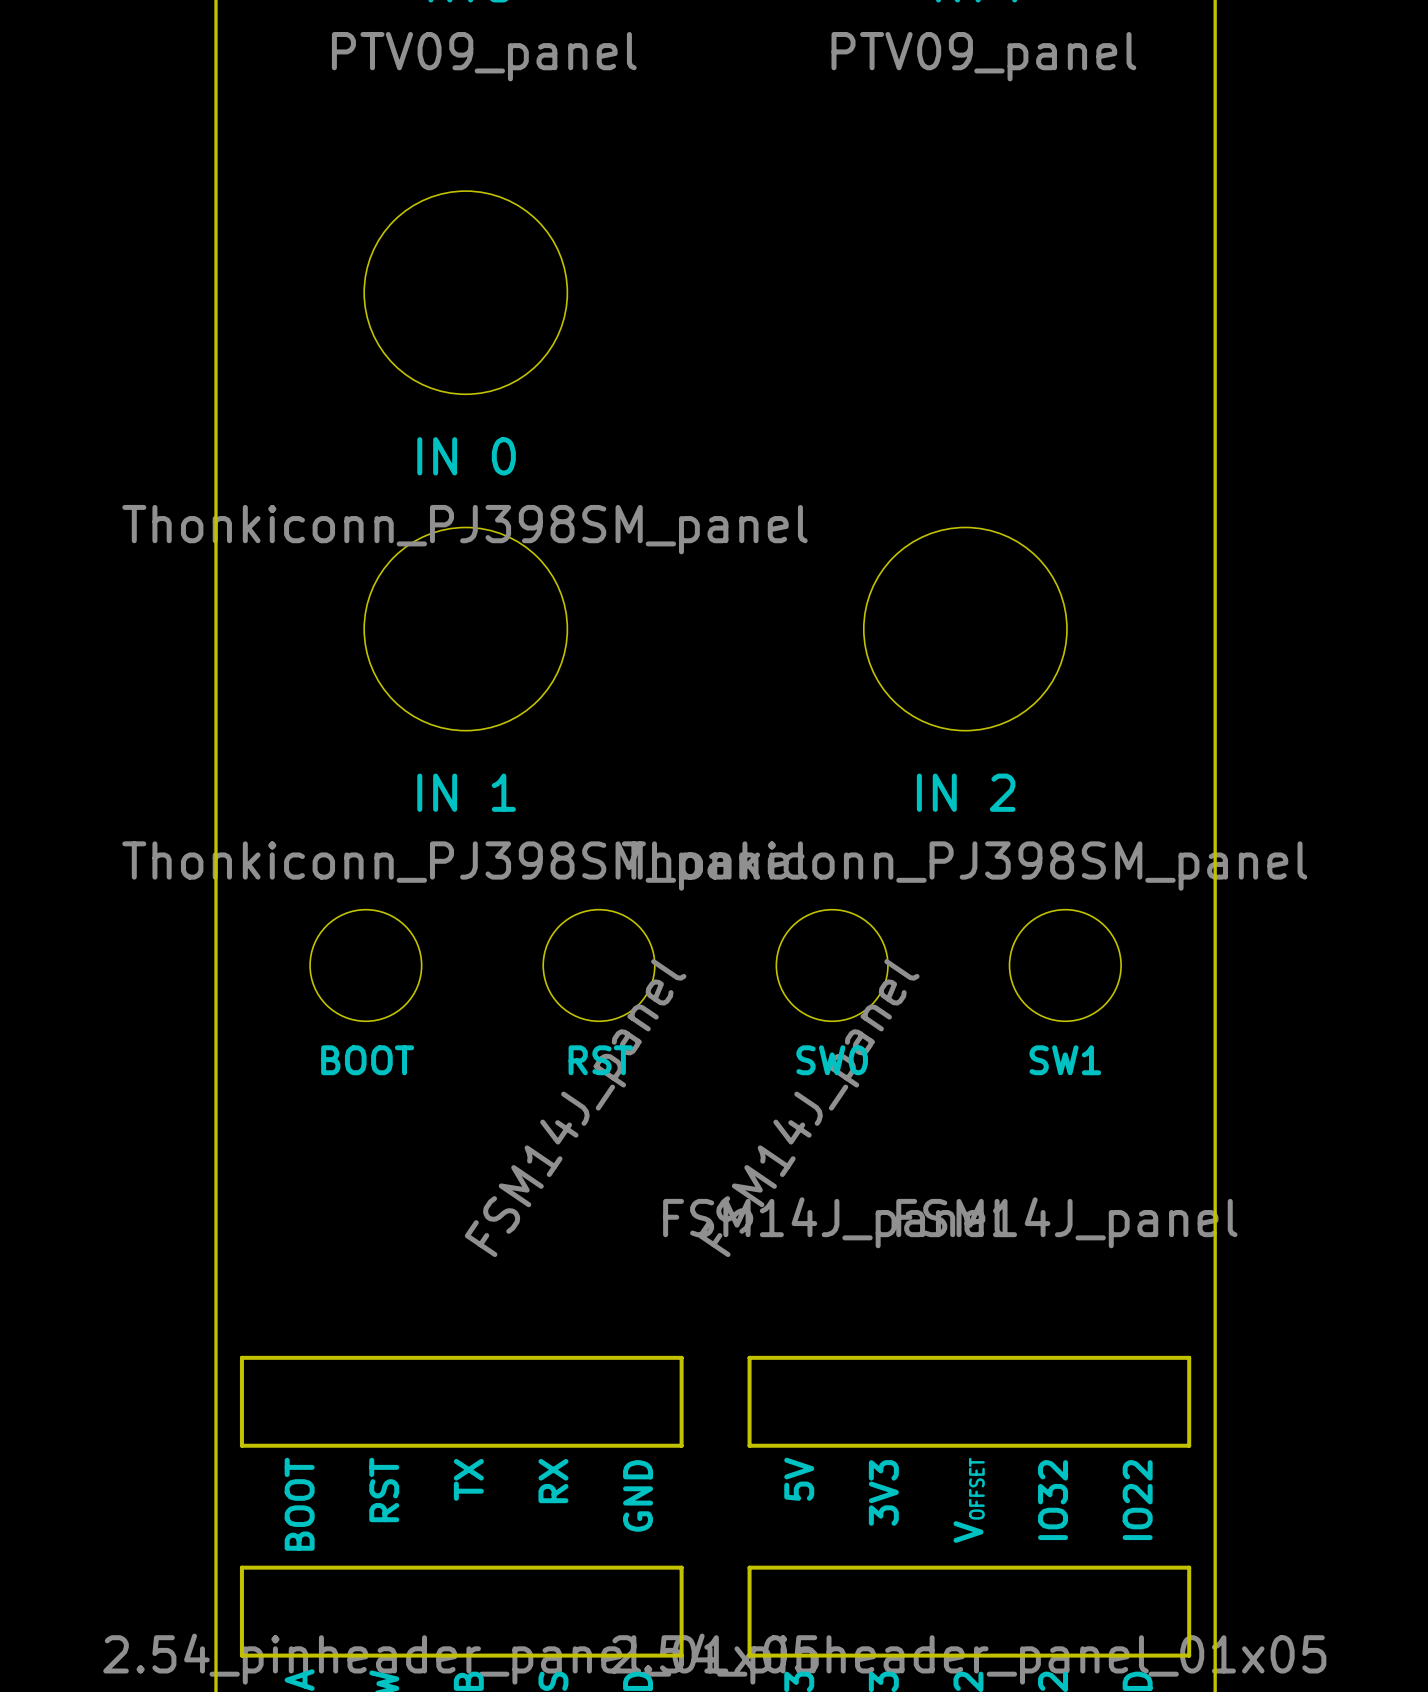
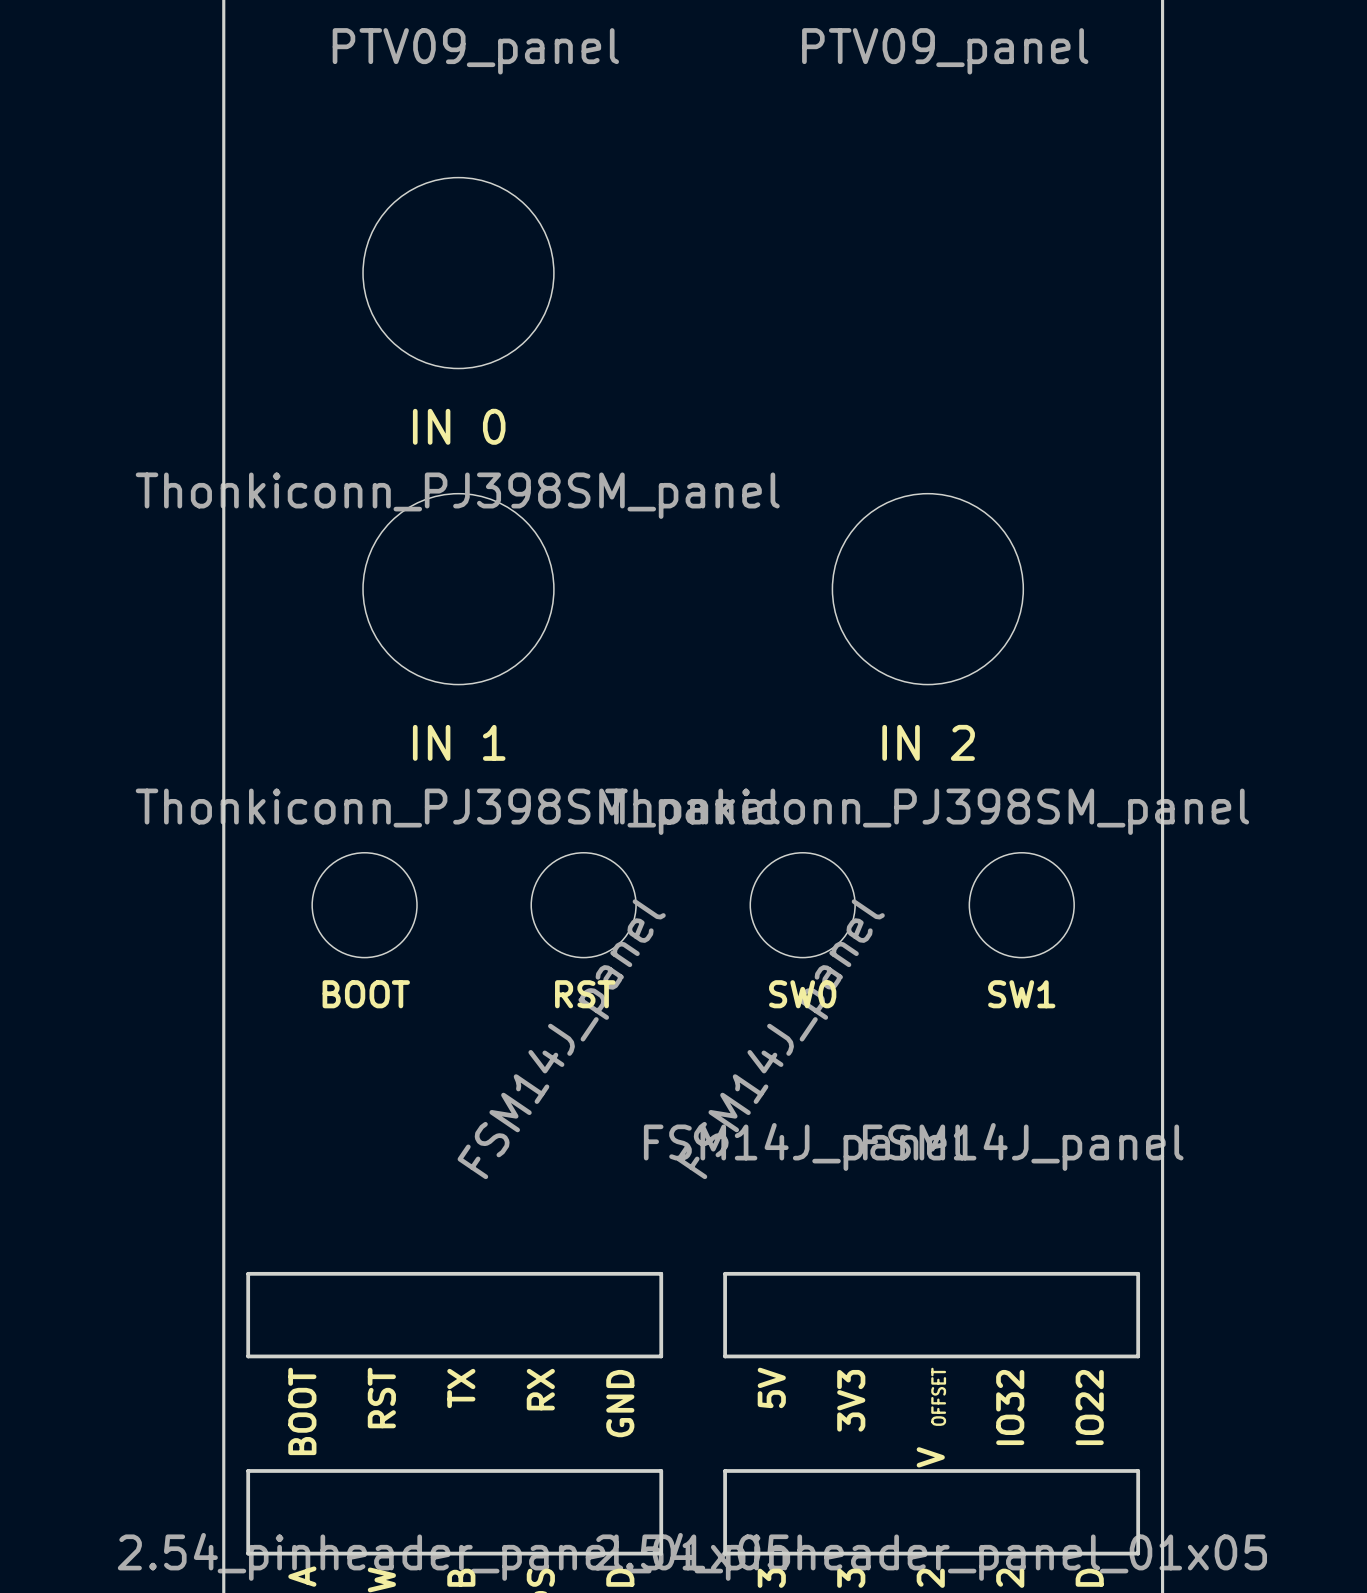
text position: V (968, 1532) -> V (930, 1457)

